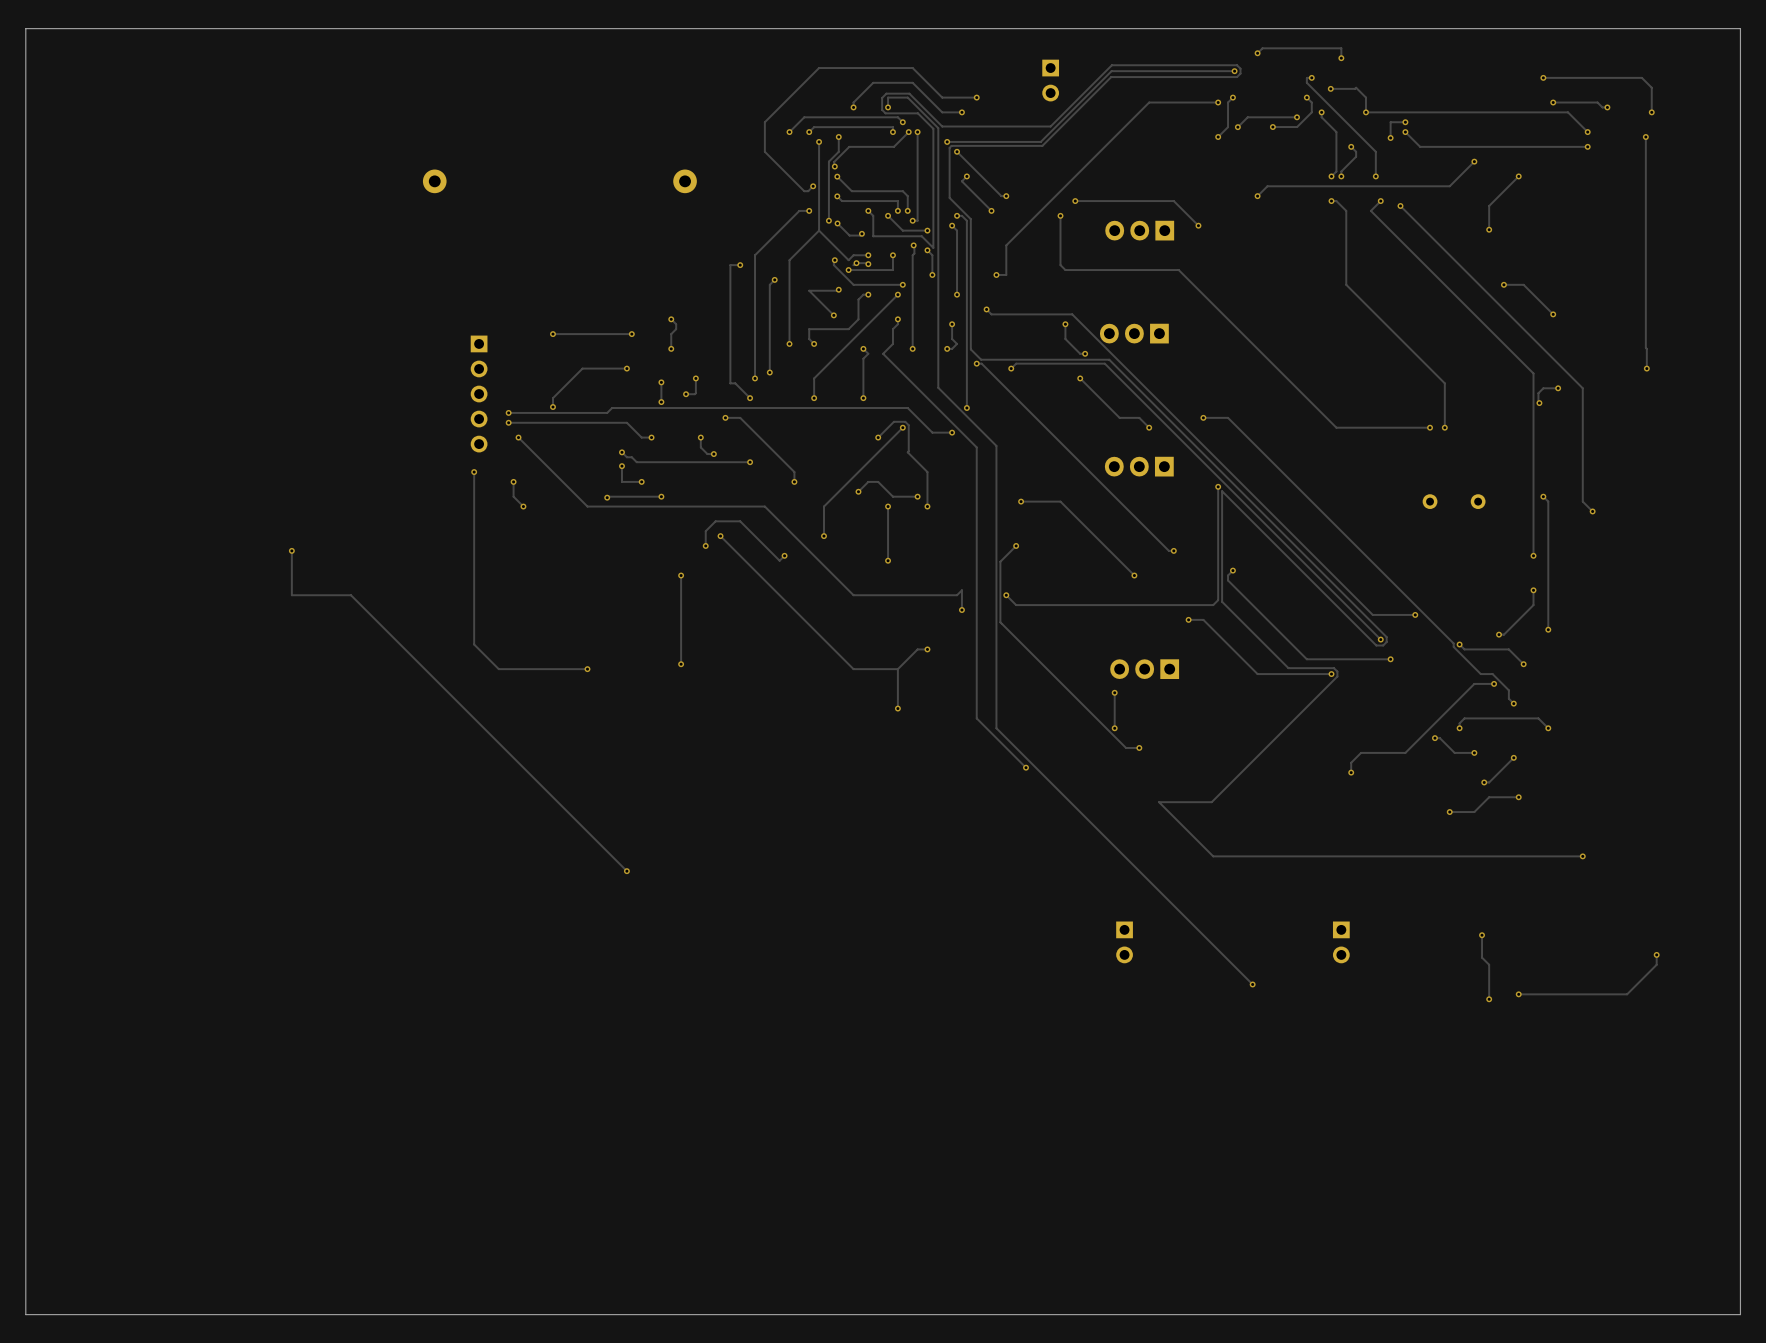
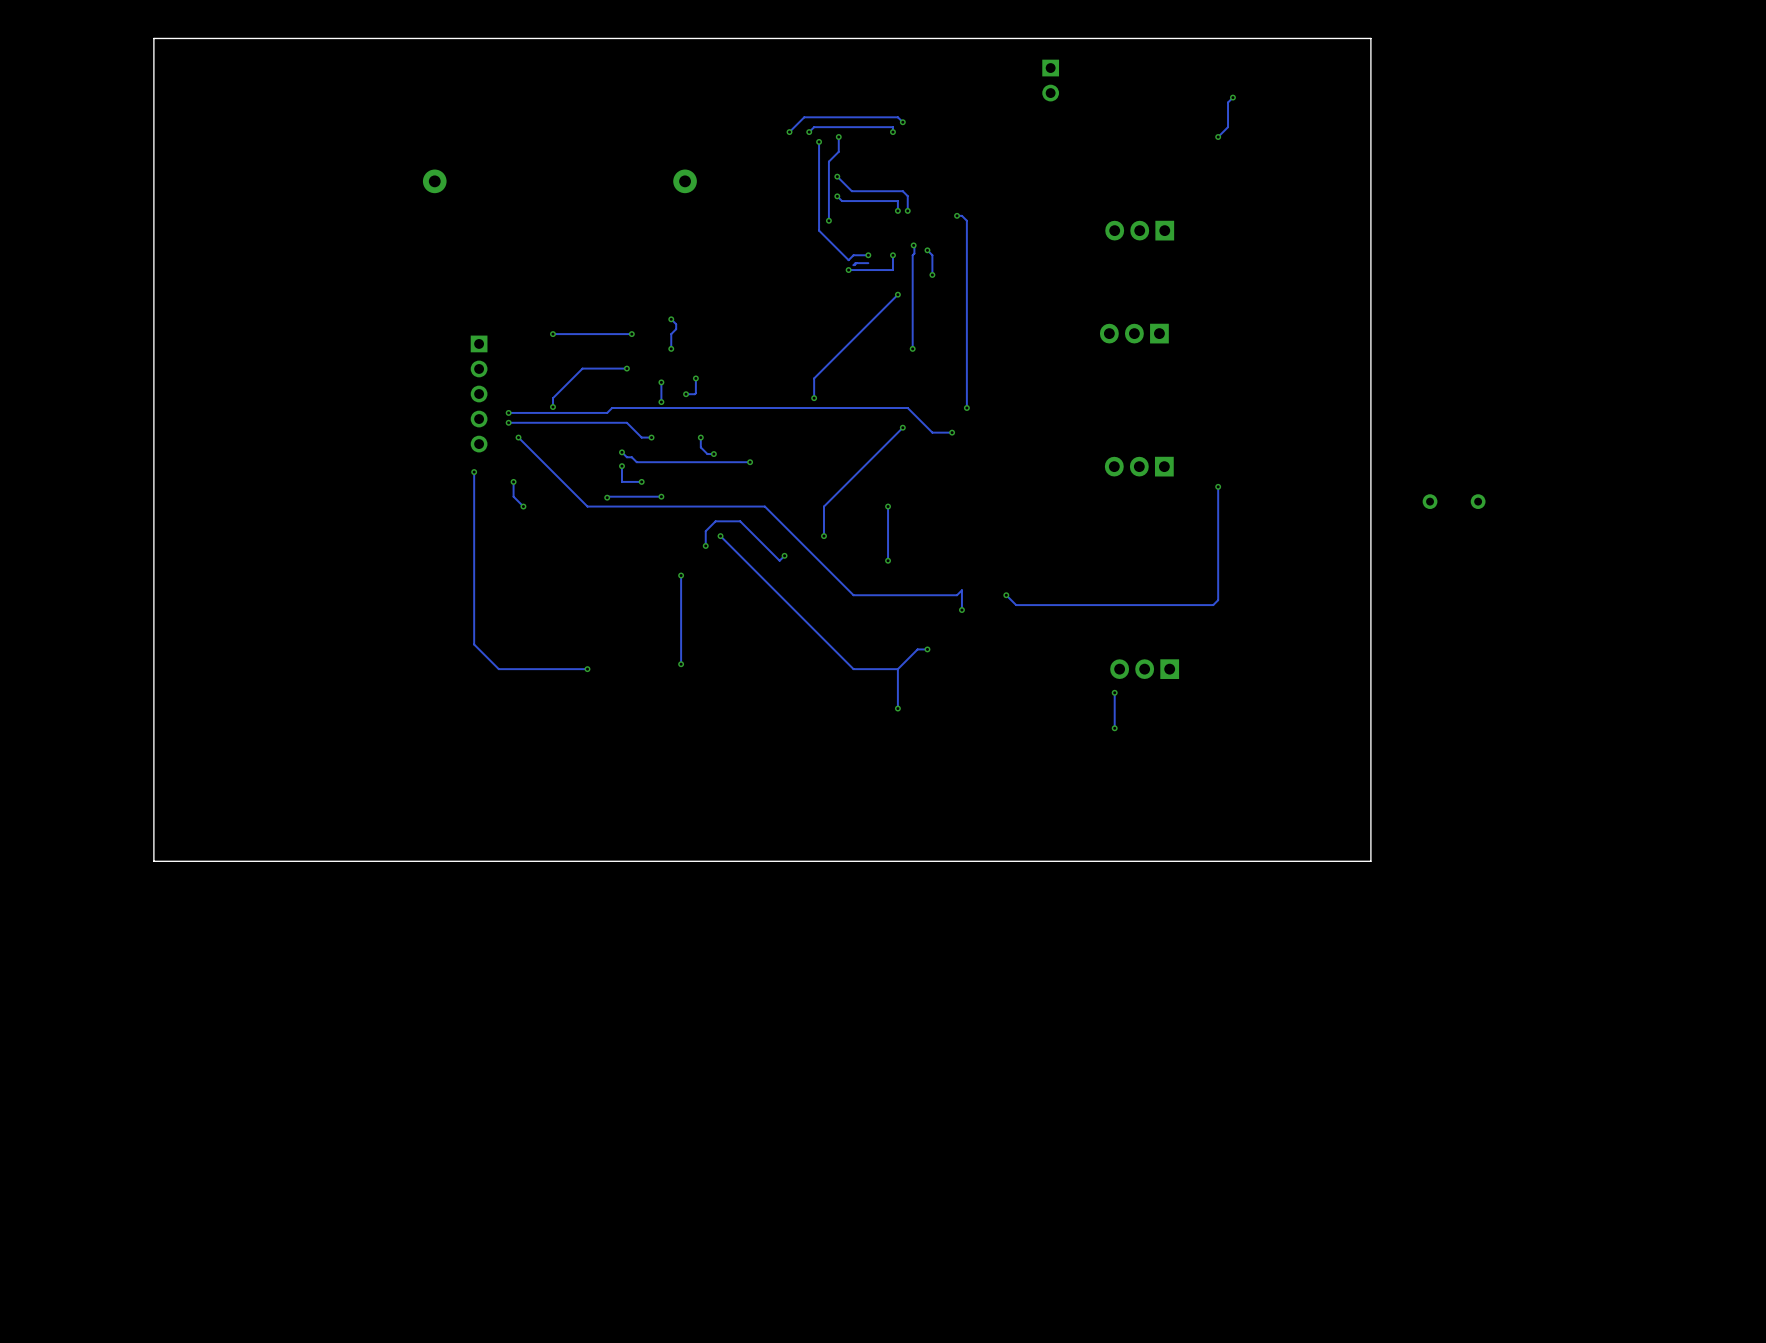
board edge: (1740, 28) (25, 28) (25, 1314) (1740, 1314) (1740, 28) -> none
board edge: none -> (1370, 38) (153, 38) (153, 861) (1370, 861) (1370, 38)
track: (1257, 53) (1262, 48) (1341, 48) (1341, 58) -> none
via: (1257, 53) -> none
via: (1341, 58) -> none
track: (1234, 71) (1111, 71) (1040, 141) (947, 141) -> none
via: (1234, 71) -> none
track: (1311, 77) (1307, 77) (1306, 82) (1375, 151) (1375, 176) -> none
via: (1311, 77) -> none
track: (1543, 77) (1641, 77) (1651, 87) (1651, 112) -> none
via: (1543, 77) -> none
track: (1330, 88) (1356, 87) (1365, 97) (1365, 112) (1568, 112) (1587, 132) -> none
via: (1330, 88) -> none
track: (976, 97) (942, 97) (912, 68) (819, 68) (764, 122) (764, 151) (804, 191) (808, 191) (813, 186) -> none
via: (976, 97) -> none
track: (1306, 97) (1311, 102) (1311, 112) (1297, 127) (1272, 127) -> none
via: (1306, 97) -> none
track: (1218, 102) (1149, 102) (1006, 245) (1006, 274) (996, 274) -> none
via: (1218, 102) -> none
track: (1553, 102) (1597, 102) (1602, 107) (1607, 107) -> none
via: (1553, 102) -> none
track: (853, 107) (853, 102) (873, 82) (912, 82) (942, 112) (961, 112) -> none
via: (853, 107) -> none
track: (888, 107) (888, 97) (907, 97) (938, 128) (938, 387) (996, 445) (996, 728) (1252, 984) -> none
via: (888, 107) -> none
via: (1607, 107) -> none
via: (961, 112) -> none
track: (1321, 112) (1321, 117) (1336, 132) (1336, 171) (1331, 176) -> none
via: (1321, 112) -> none
via: (1365, 112) -> none
via: (1651, 112) -> none
track: (1297, 117) (1247, 117) (1237, 127) -> none
via: (1297, 117) -> none
track: (1405, 122) (1390, 122) (1390, 137) -> none
via: (1405, 122) -> none
via: (1237, 127) -> none
via: (1272, 127) -> none
track: (908, 132) (893, 146) (849, 146) (834, 161) (834, 166) -> none
via: (908, 132) -> none
track: (917, 132) (917, 220) (912, 220) -> none
via: (917, 132) -> none
track: (1405, 132) (1420, 146) (1587, 146) -> none
via: (1405, 132) -> none
via: (1587, 132) -> none
via: (1390, 137) -> none
track: (1645, 137) (1646, 368) -> none
via: (1645, 137) -> none
via: (947, 141) -> none
track: (1351, 146) (1356, 151) (1356, 156) (1341, 171) (1341, 176) -> none
via: (1351, 146) -> none
via: (1587, 146) -> none
track: (957, 151) (1001, 196) (1006, 196) -> none
via: (957, 151) -> none
track: (1474, 161) (1449, 186) (1267, 186) (1257, 196) -> none
via: (1474, 161) -> none
via: (834, 166) -> none
track: (966, 176) (961, 181) (991, 210) -> none
via: (966, 176) -> none
via: (1331, 176) -> none
via: (1341, 176) -> none
via: (1375, 176) -> none
track: (1518, 176) (1489, 205) (1489, 229) -> none
via: (1518, 176) -> none
via: (813, 186) -> none
via: (1006, 196) -> none
via: (1257, 196) -> none
track: (1075, 201) (1173, 201) (1198, 225) -> none
via: (1075, 201) -> none
track: (1331, 201) (1336, 201) (1346, 210) (1346, 284) (1444, 383) (1444, 427) -> none
via: (1331, 201) -> none
track: (1380, 201) (1370, 210) (1533, 373) (1533, 555) -> none
via: (1380, 201) -> none
track: (1400, 205) (1582, 388) (1582, 501) (1592, 511) -> none
via: (1400, 205) -> none
track: (809, 210) (799, 210) (755, 255) (755, 378) -> none
via: (809, 210) -> none
track: (868, 210) (873, 215) (873, 236) (921, 236) (933, 247) (933, 128) (917, 113) (885, 113) (882, 109) (882, 97) (886, 93) (909, 93) (942, 126) (1050, 126) (1111, 65) (1237, 65) (1240, 68) (1240, 73) (1237, 77) (1111, 77) (1042, 145) (951, 145) (949, 147) (949, 197) (970, 219) (970, 349) (981, 359) (1109, 359) (1386, 637) (1386, 642) (1383, 645) (1376, 645) (1222, 491) (1222, 601) (1288, 668) (1333, 668) (1337, 671) (1337, 676) (1211, 802) (1159, 802) (1213, 856) (1582, 856) -> none
via: (868, 210) -> none
via: (991, 210) -> none
track: (888, 215) (902, 230) (927, 230) -> none
via: (888, 215) -> none
track: (1060, 215) (1060, 265) (1065, 270) (1178, 270) (1336, 427) (1430, 427) -> none
via: (1060, 215) -> none
via: (912, 220) -> none
track: (837, 223) (849, 235) (861, 233) -> none
via: (837, 223) -> none
track: (952, 225) (957, 230) (957, 294) -> none
via: (952, 225) -> none
via: (1198, 225) -> none
via: (1489, 229) -> none
track: (819, 230) (789, 260) (789, 343) -> none
via: (927, 230) -> none
via: (861, 233) -> none
track: (834, 260) (833, 265) (853, 284) (902, 284) -> none
via: (834, 260) -> none
via: (856, 263) -> none
via: (868, 264) -> none
track: (740, 265) (730, 265) (730, 383) (735, 383) (750, 398) -> none
via: (740, 265) -> none
via: (996, 274) -> none
track: (774, 279) (769, 284) (769, 372) -> none
via: (774, 279) -> none
via: (902, 284) -> none
track: (1503, 284) (1523, 284) (1553, 314) -> none
via: (1503, 284) -> none
track: (838, 289) (809, 290) (833, 315) -> none
via: (838, 289) -> none
track: (868, 294) (863, 294) (858, 299) (858, 319) (848, 329) (809, 329) (809, 339) (814, 343) -> none
via: (868, 294) -> none
via: (957, 294) -> none
track: (986, 309) (991, 314) (1072, 314) (1372, 614) (1415, 614) -> none
via: (986, 309) -> none
via: (1553, 314) -> none
via: (833, 315) -> none
track: (897, 319) (897, 324) (892, 329) (892, 343) (883, 353) (976, 447) (976, 718) (1026, 767) -> none
via: (897, 319) -> none
track: (952, 324) (952, 339) (957, 343) (952, 348) (947, 348) -> none
via: (952, 324) -> none
track: (1065, 324) (1065, 339) (1080, 353) (1085, 353) -> none
via: (1065, 324) -> none
via: (789, 343) -> none
via: (814, 343) -> none
track: (863, 348) (868, 353) (863, 358) (863, 398) -> none
via: (863, 348) -> none
via: (947, 348) -> none
via: (1085, 353) -> none
track: (976, 363) (981, 363) (1168, 550) (1173, 550) -> none
via: (976, 363) -> none
track: (1011, 368) (1016, 363) (1104, 363) (1380, 639) -> none
via: (1011, 368) -> none
via: (1646, 368) -> none
via: (769, 372) -> none
via: (755, 378) -> none
track: (1080, 378) (1119, 417) (1139, 417) (1149, 427) -> none
via: (1080, 378) -> none
track: (1558, 388) (1543, 388) (1538, 393) (1539, 403) -> none
via: (1558, 388) -> none
via: (750, 398) -> none
via: (863, 398) -> none
via: (1539, 403) -> none
track: (725, 417) (740, 417) (794, 472) (794, 481) -> none
via: (725, 417) -> none
track: (1203, 417) (1228, 417) (1453, 643) (1453, 646) (1480, 674) (1492, 674) (1508, 690) (1508, 698) (1513, 703) -> none
via: (1203, 417) -> none
via: (1149, 427) -> none
via: (1430, 427) -> none
via: (1444, 427) -> none
track: (878, 437) (893, 421) (905, 421) (908, 425) (907, 452) (927, 472) (927, 506) -> none
via: (878, 437) -> none
via: (794, 481) -> none
track: (858, 491) (868, 481) (878, 481) (892, 496) (917, 496) -> none
via: (858, 491) -> none
via: (917, 496) -> none
track: (1543, 496) (1548, 501) (1548, 629) -> none
via: (1543, 496) -> none
track: (1021, 501) (1060, 501) (1134, 575) -> none
via: (1021, 501) -> none
via: (927, 506) -> none
via: (1592, 511) -> none
track: (1016, 545) (1000, 561) (1000, 622) (1126, 747) (1139, 747) -> none
via: (1016, 545) -> none
track: (291, 550) (291, 595) (350, 595) (626, 871) -> none
via: (291, 550) -> none
via: (1173, 550) -> none
via: (1533, 555) -> none
track: (1232, 570) (1228, 575) (1228, 580) (1306, 659) (1390, 659) -> none
via: (1232, 570) -> none
via: (1134, 575) -> none
track: (1533, 590) (1533, 605) (1503, 634) (1499, 634) -> none
via: (1533, 590) -> none
via: (1415, 614) -> none
track: (1188, 619) (1203, 619) (1257, 674) (1331, 674) -> none
via: (1188, 619) -> none
via: (1548, 629) -> none
via: (1499, 634) -> none
via: (1380, 639) -> none
track: (1459, 644) (1464, 649) (1508, 649) (1523, 664) -> none
via: (1459, 644) -> none
via: (1390, 659) -> none
via: (1523, 664) -> none
via: (1331, 674) -> none
track: (1494, 683) (1474, 683) (1405, 752) (1361, 752) (1351, 762) (1351, 772) -> none
via: (1494, 683) -> none
via: (1513, 703) -> none
via: (1459, 728) -> none
track: (1548, 728) (1538, 718) (1464, 718) (1459, 723) (1459, 728) -> none
via: (1548, 728) -> none
track: (1434, 738) (1439, 738) (1454, 752) (1474, 752) -> none
via: (1434, 738) -> none
via: (1139, 747) -> none
via: (1474, 752) -> none
track: (1513, 757) (1489, 782) (1484, 782) -> none
via: (1513, 757) -> none
via: (1026, 767) -> none
via: (1351, 772) -> none
via: (1484, 782) -> none
track: (1518, 797) (1489, 797) (1474, 812) (1449, 812) -> none
via: (1518, 797) -> none
via: (1449, 812) -> none
via: (1582, 856) -> none
via: (626, 871) -> none
track: (1482, 935) (1482, 957) (1489, 964) (1489, 999) -> none
via: (1482, 935) -> none
part: (1124, 942) -> none
part: (1341, 942) -> none
track: (1656, 954) (1656, 964) (1627, 994) (1518, 994) -> none
via: (1656, 954) -> none
via: (1252, 984) -> none
via: (1518, 994) -> none
via: (1489, 999) -> none

